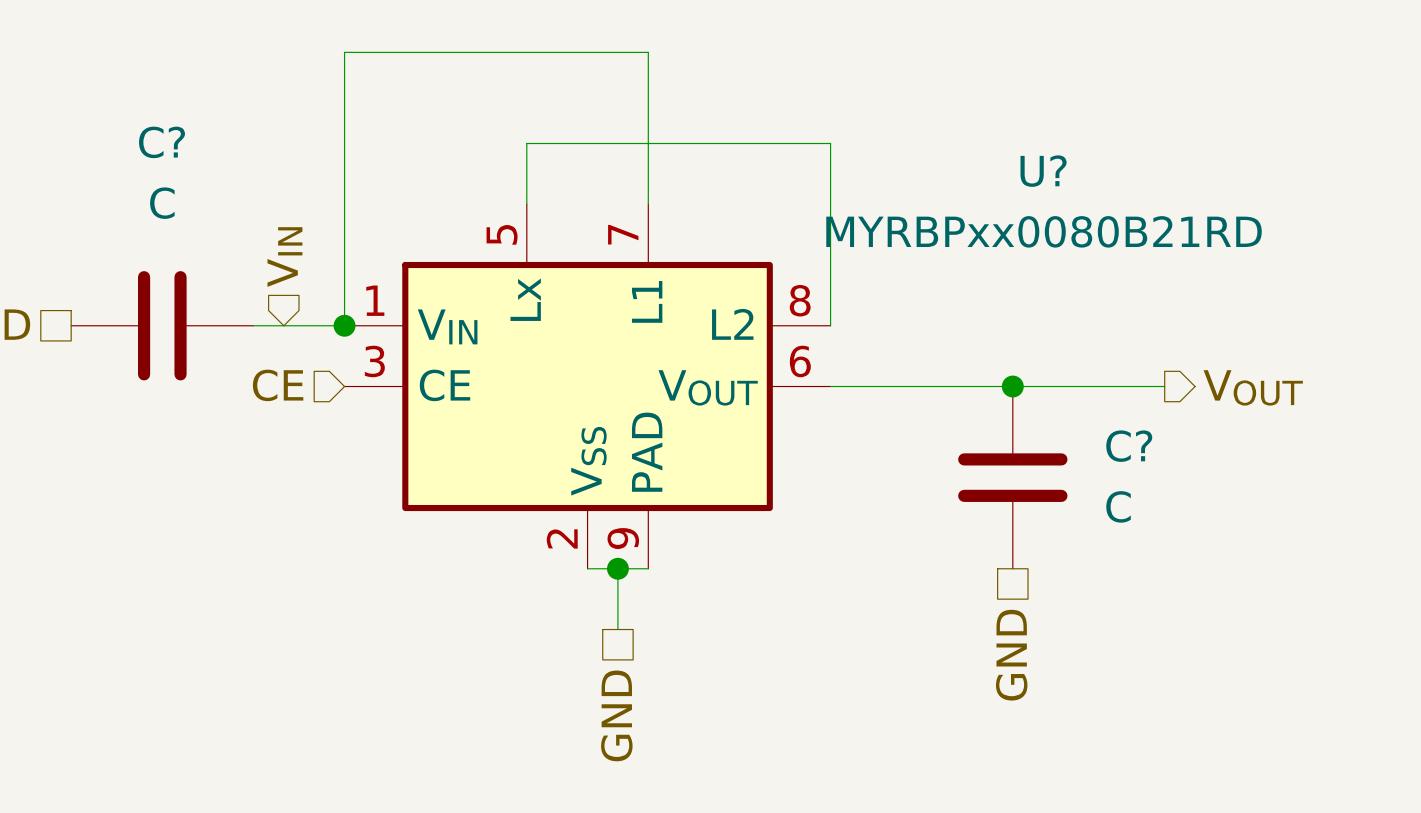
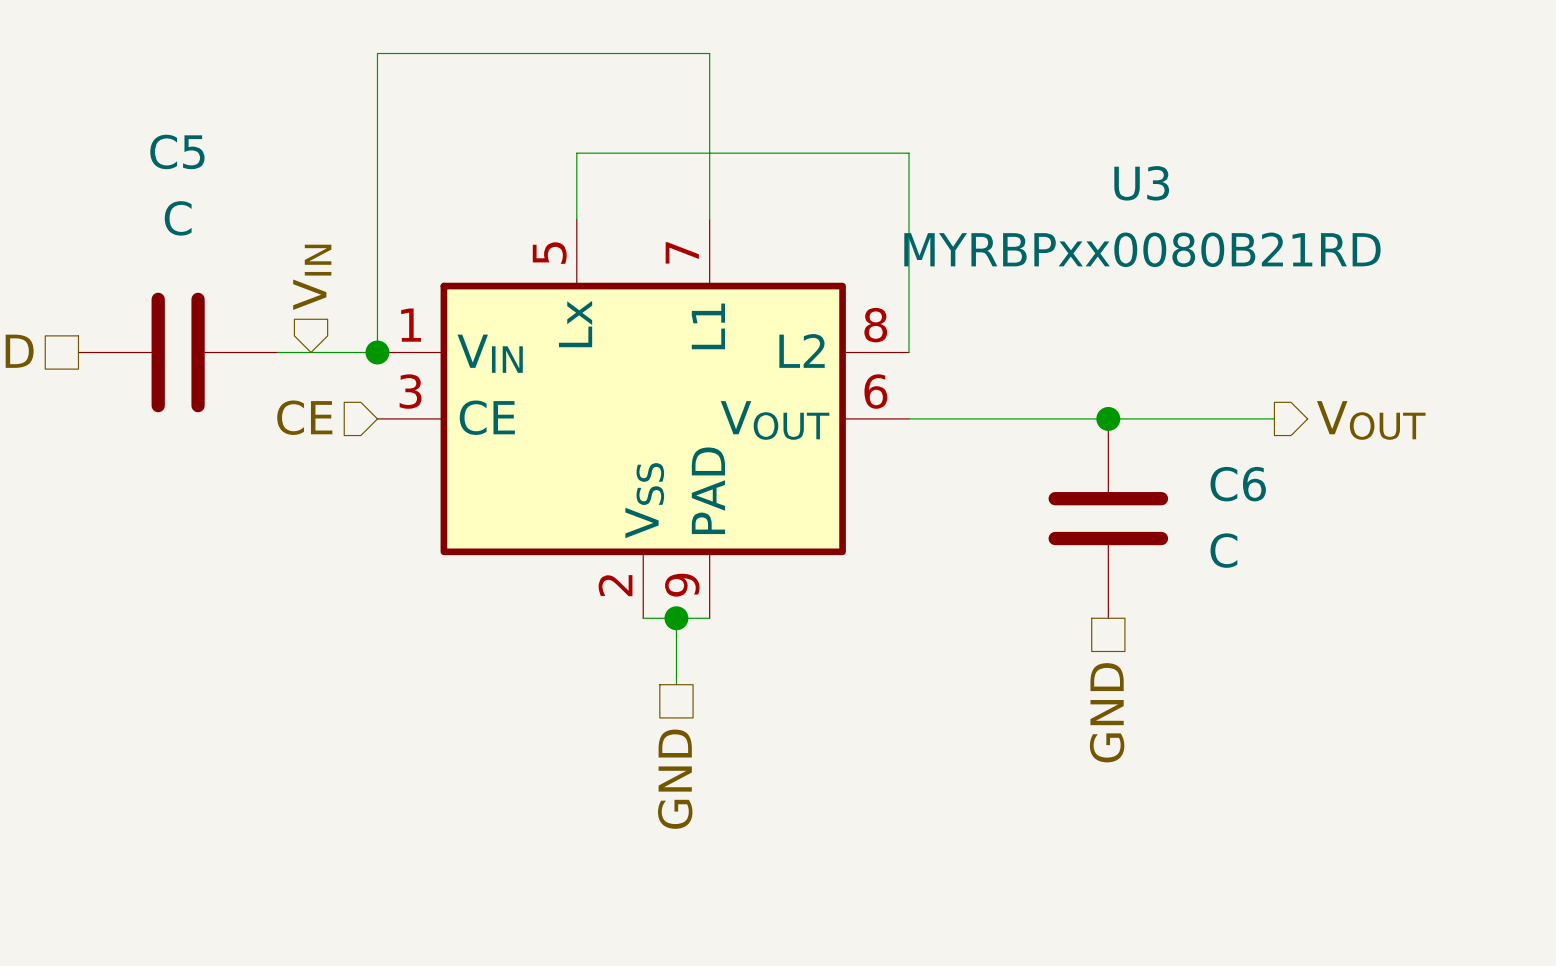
C? name: C? (162, 142) -> C5 (177, 151)
U? name: U? (1043, 171) -> U3 (1141, 183)
C? name: C? (1129, 446) -> C6 (1238, 484)

